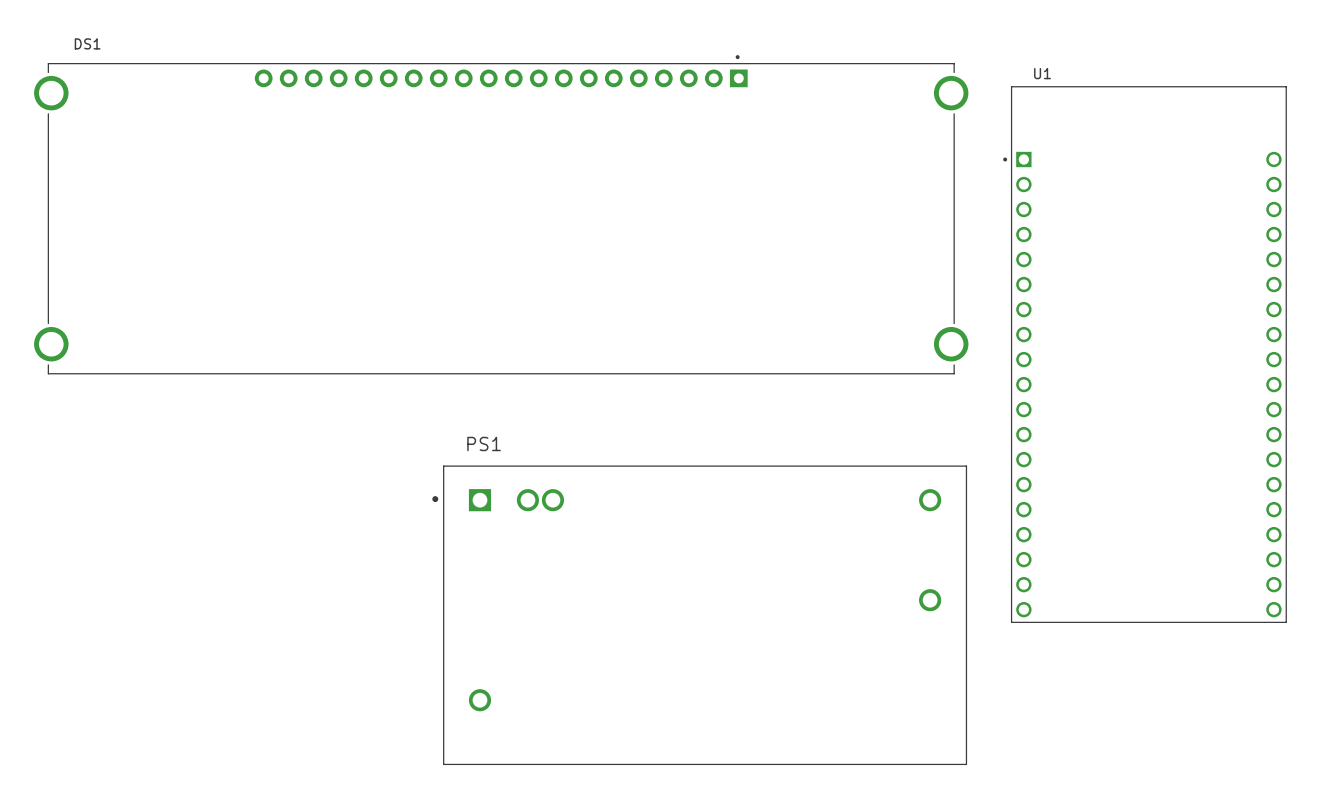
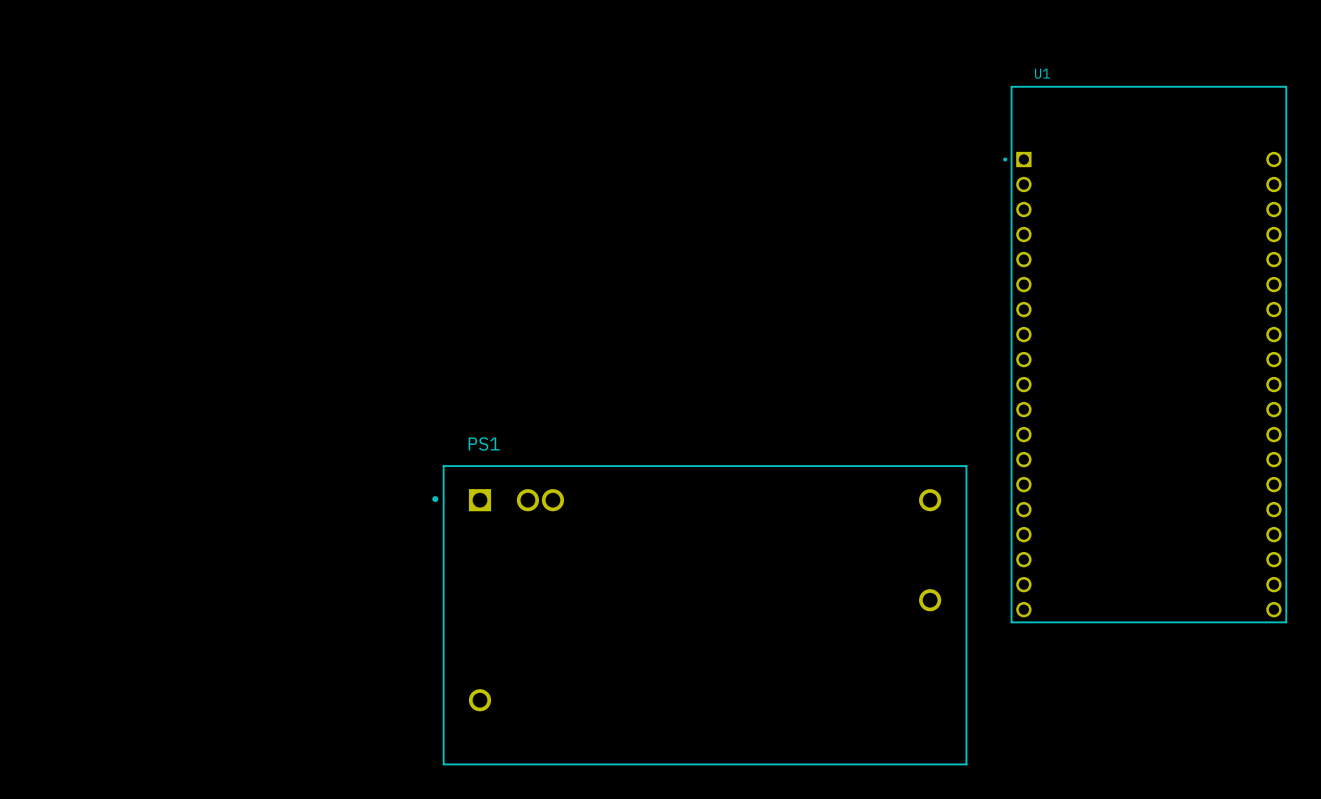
DS1: (501, 214) -> none

